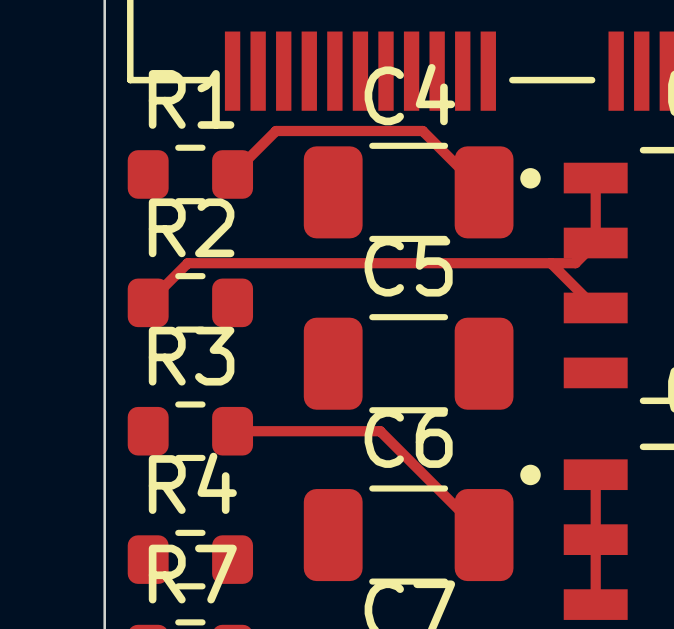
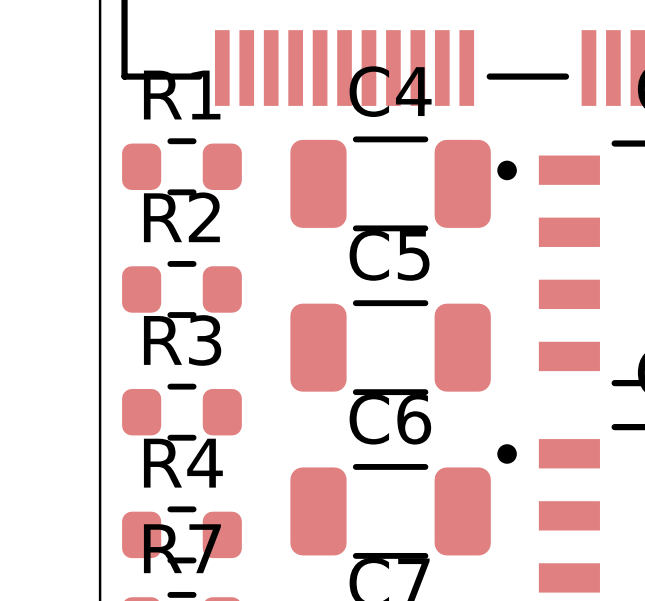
track: (232, 174) (276, 131) (422, 131) (484, 192) -> none
track: (595, 178) (595, 243) (575, 263) (187, 263) (148, 302) -> none
track: (550, 263) (595, 307) -> none
track: (232, 431) (380, 431) (484, 535) -> none
track: (595, 474) (595, 604) -> none

